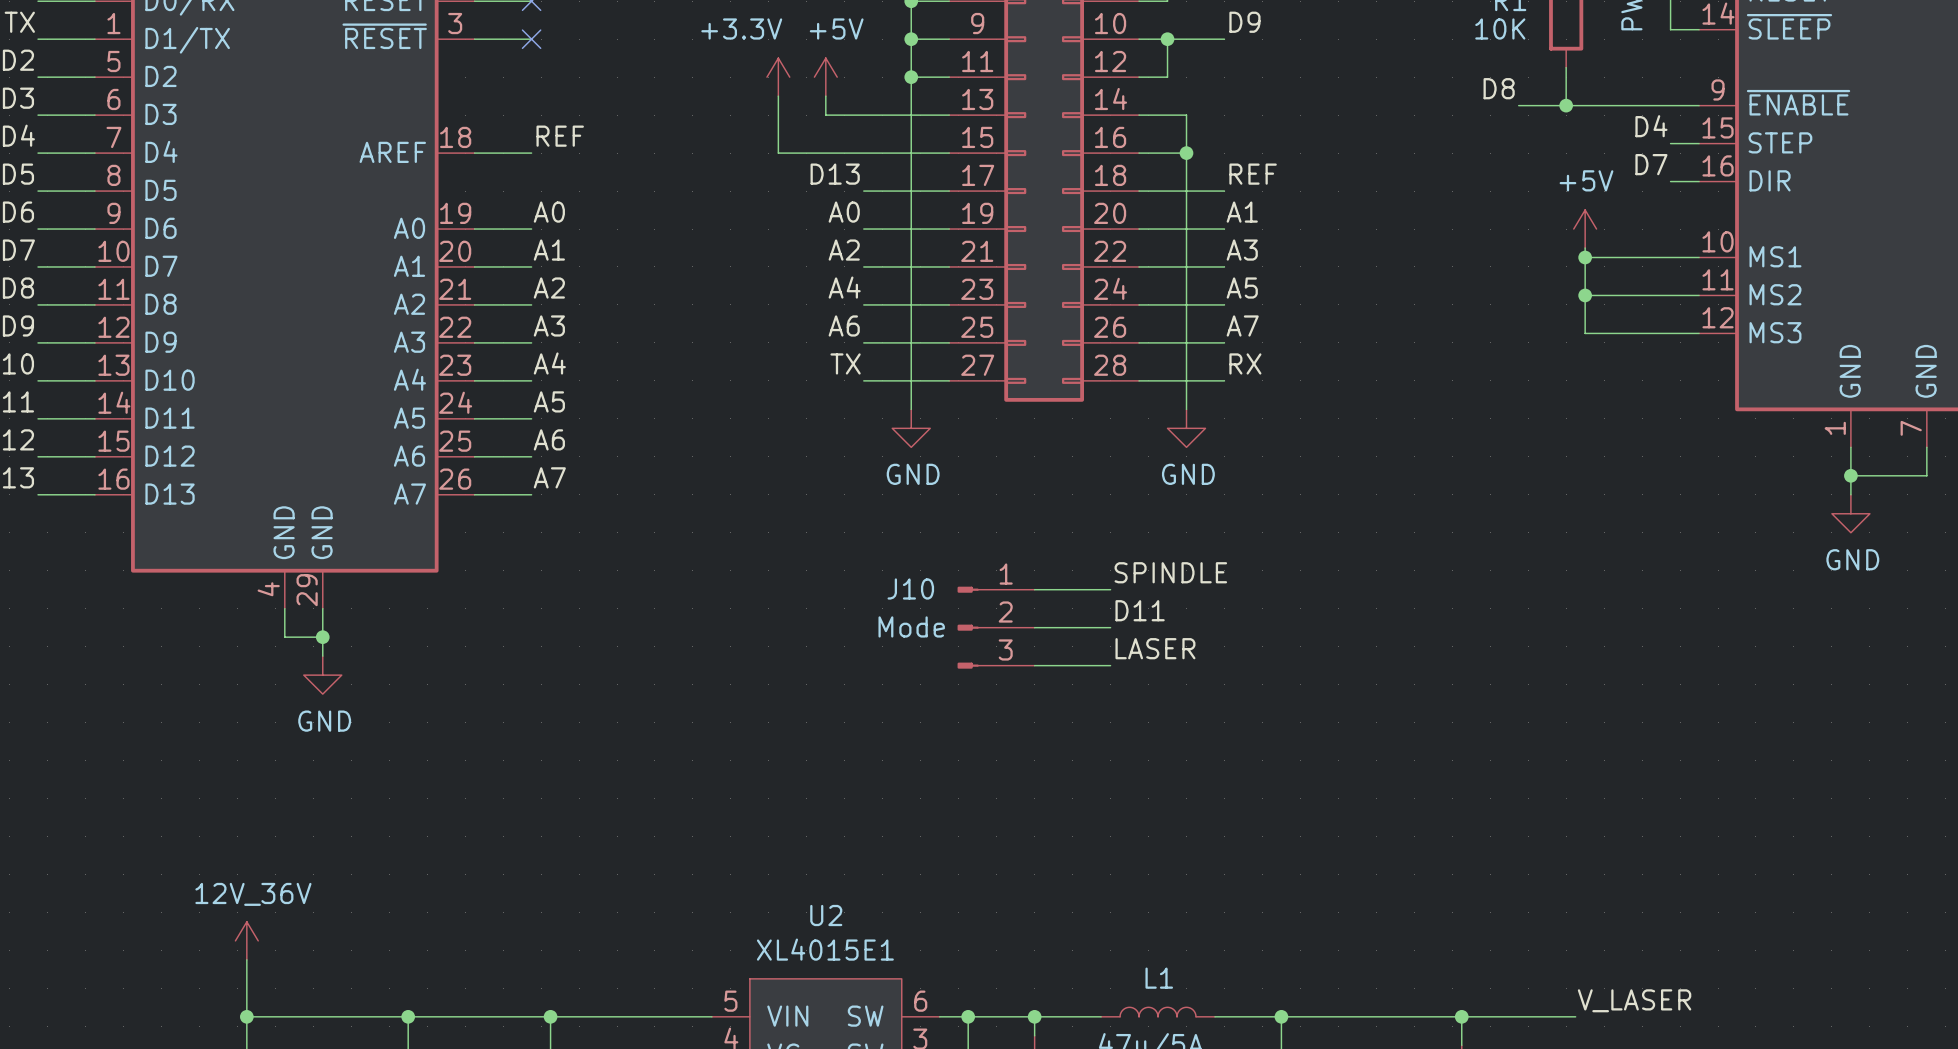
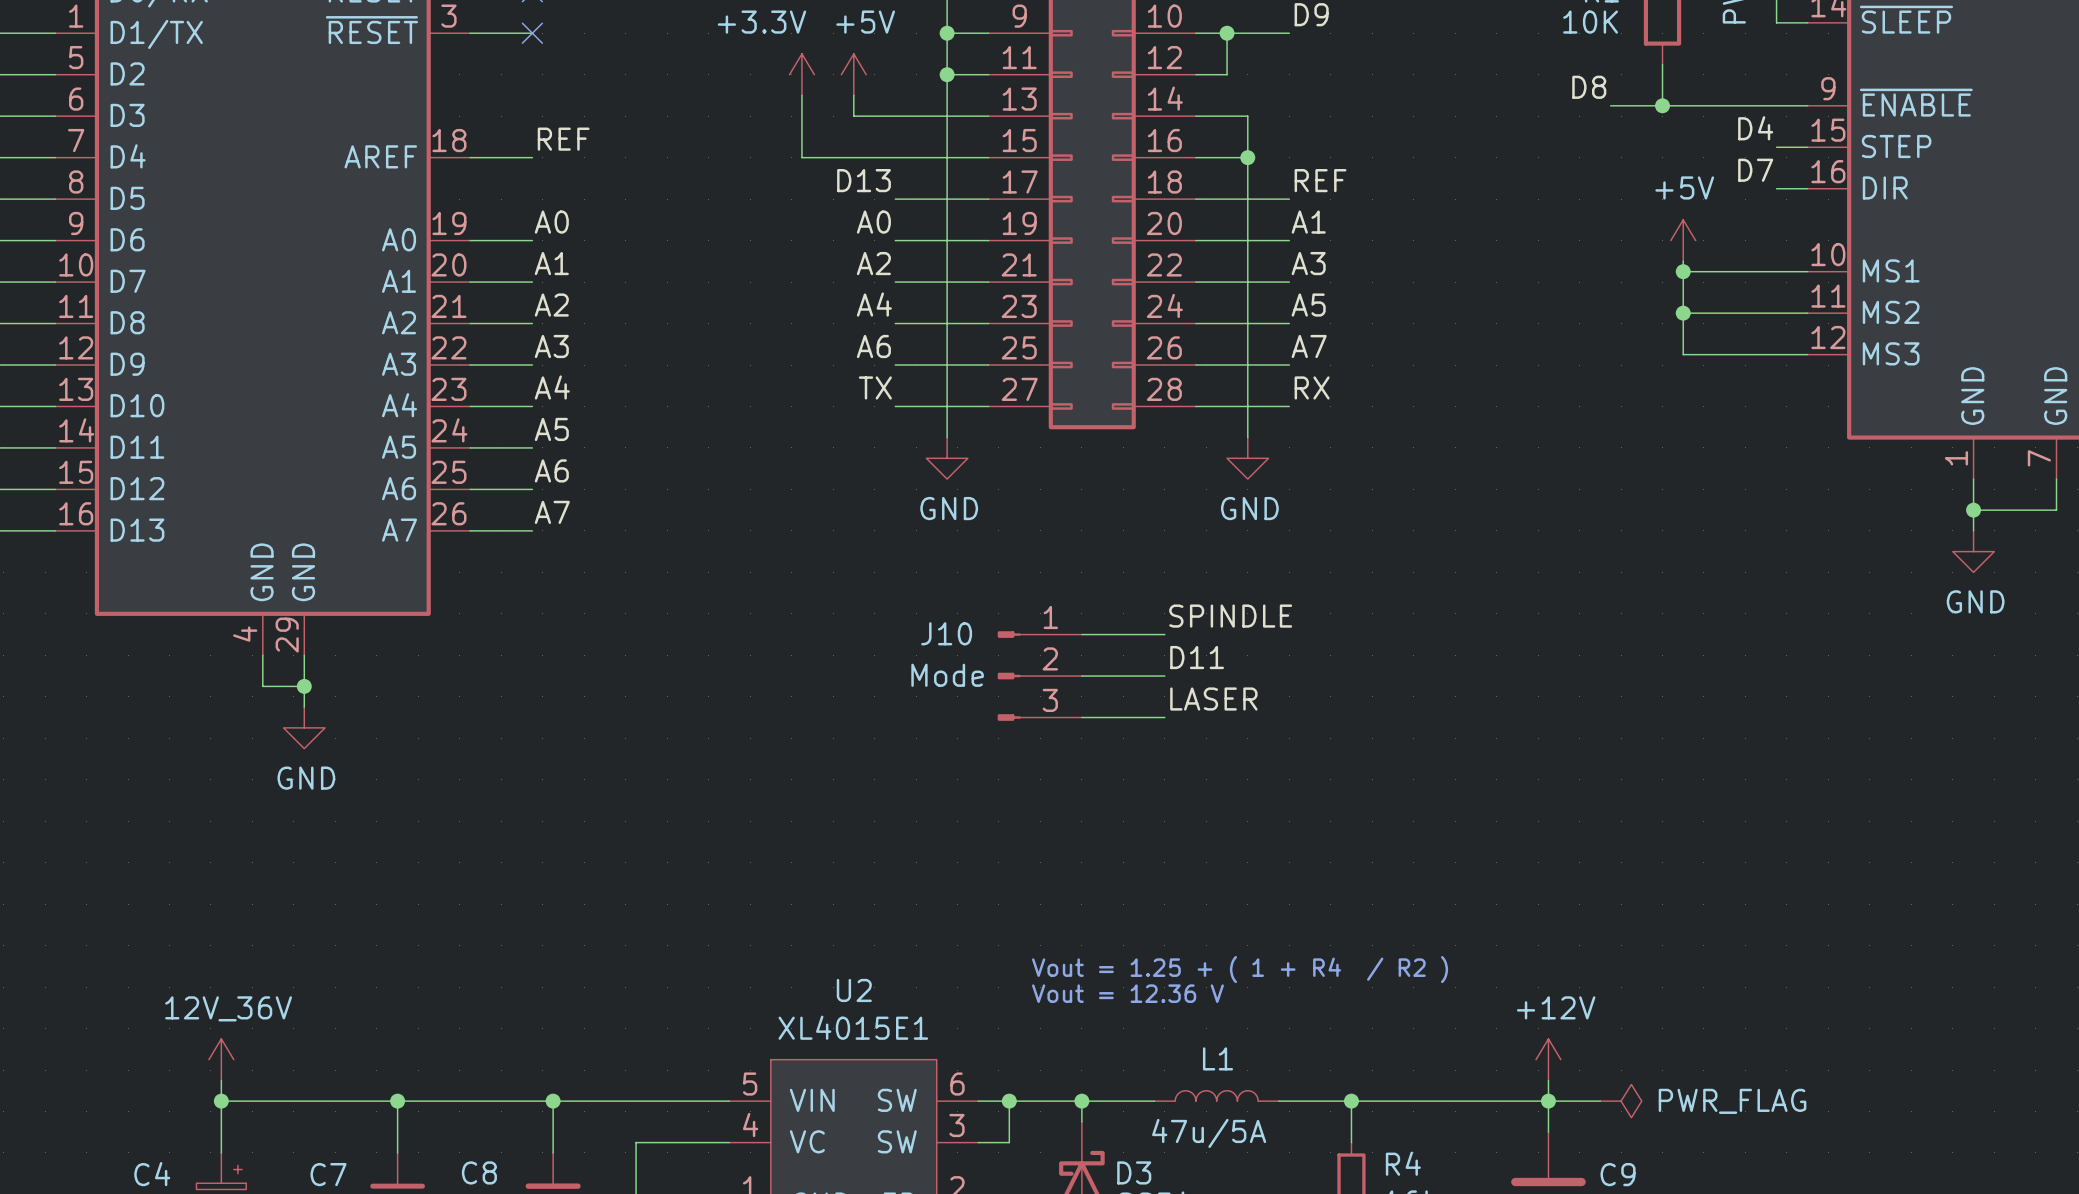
text: none -> Vout = 1.25 + ( 1 + R4 / R2 ) (1240, 969)
text: none -> Vout = 12.36 V (1127, 993)
power symbol position: 12V_36V (246, 940) -> 12V_36V (221, 1059)
power symbol: none -> +12V (1548, 1059)
wire: none -> (1548, 1080) (1548, 1101)
label: V_LASER (1634, 1000) -> none
wire: (1509, 1016) (1575, 1016) -> none
power symbol: none -> PWR_FLAG (1621, 1101)

